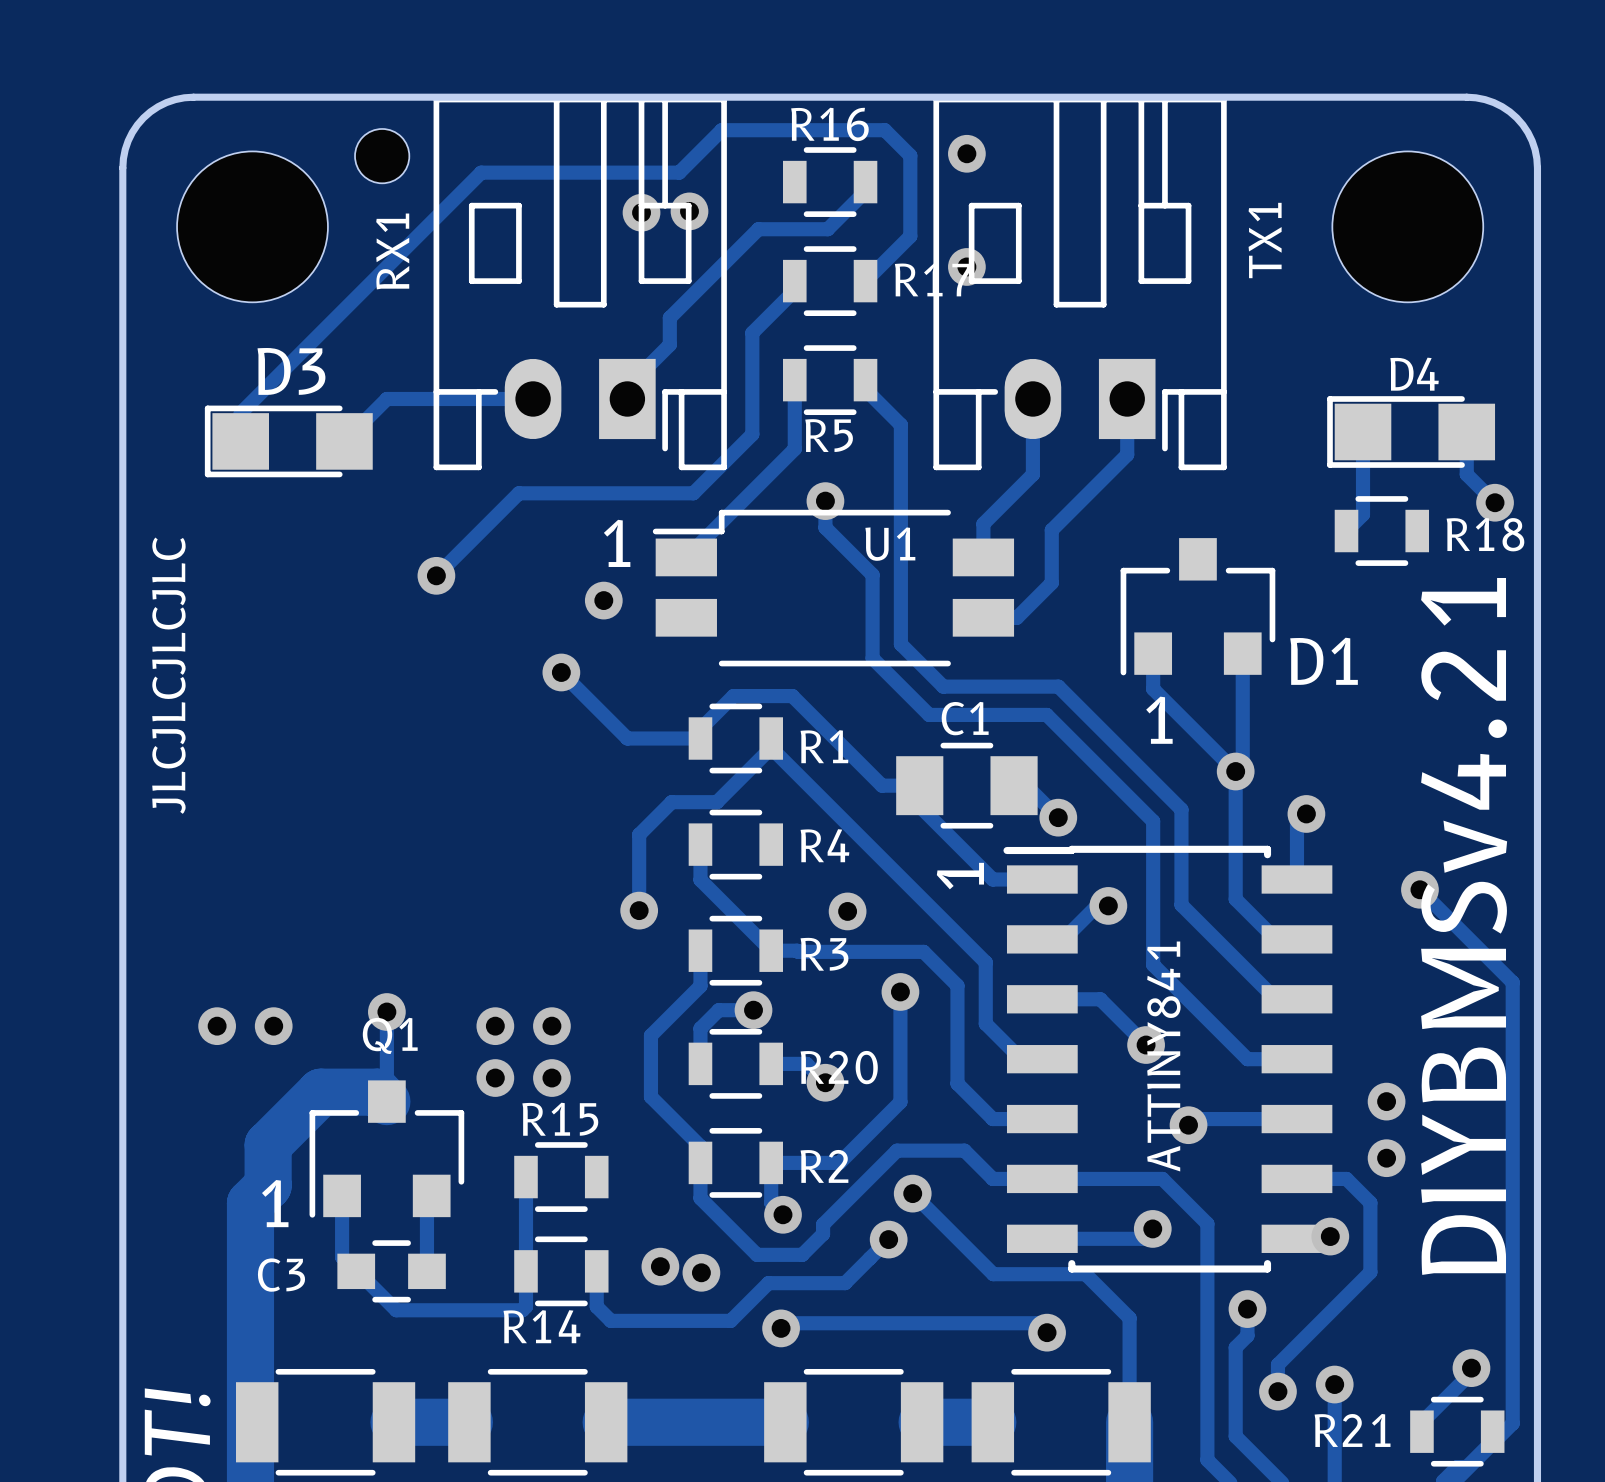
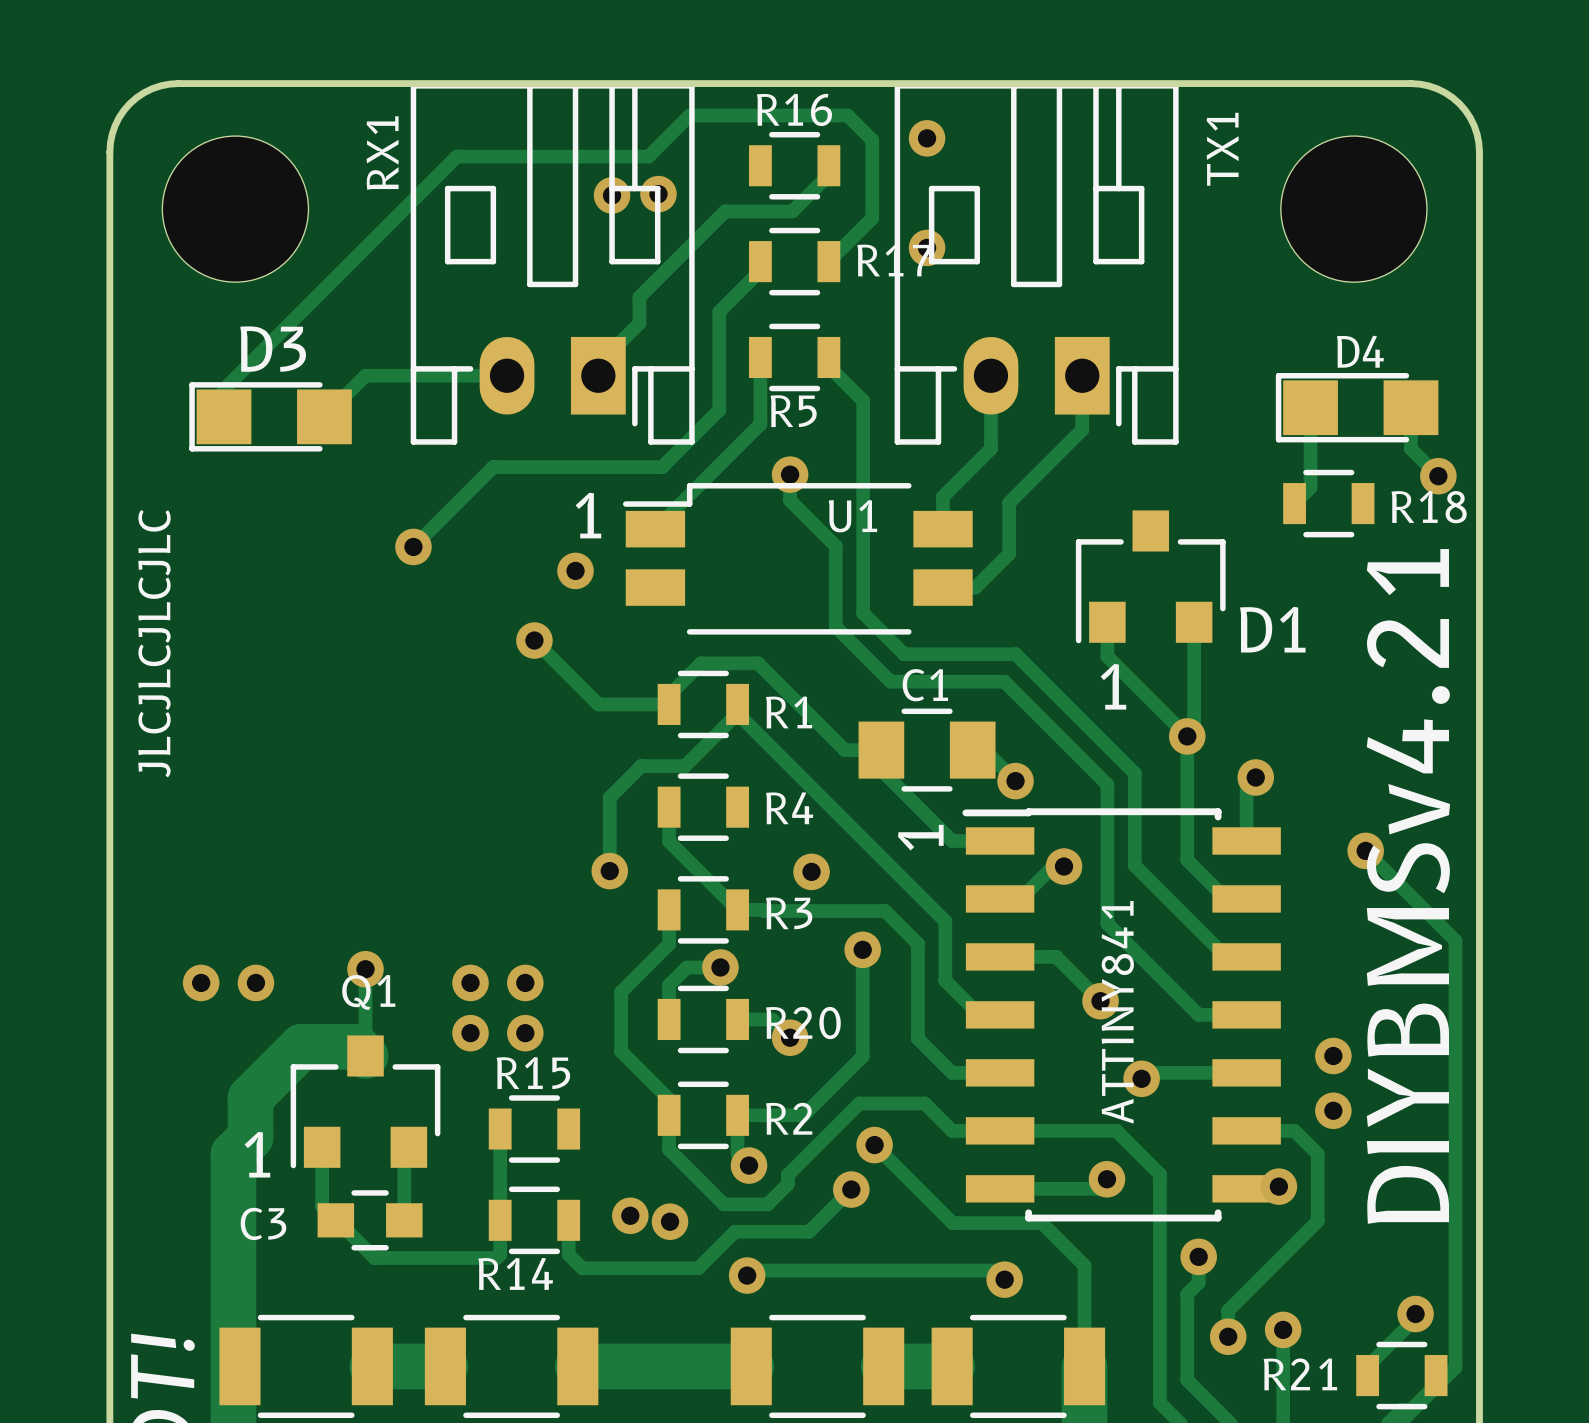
part: (382, 156) -> none
TX1 name position: TX1 (1265, 240) -> TX1 (1222, 149)
RX1 name position: RX1 (392, 251) -> RX1 (382, 153)

